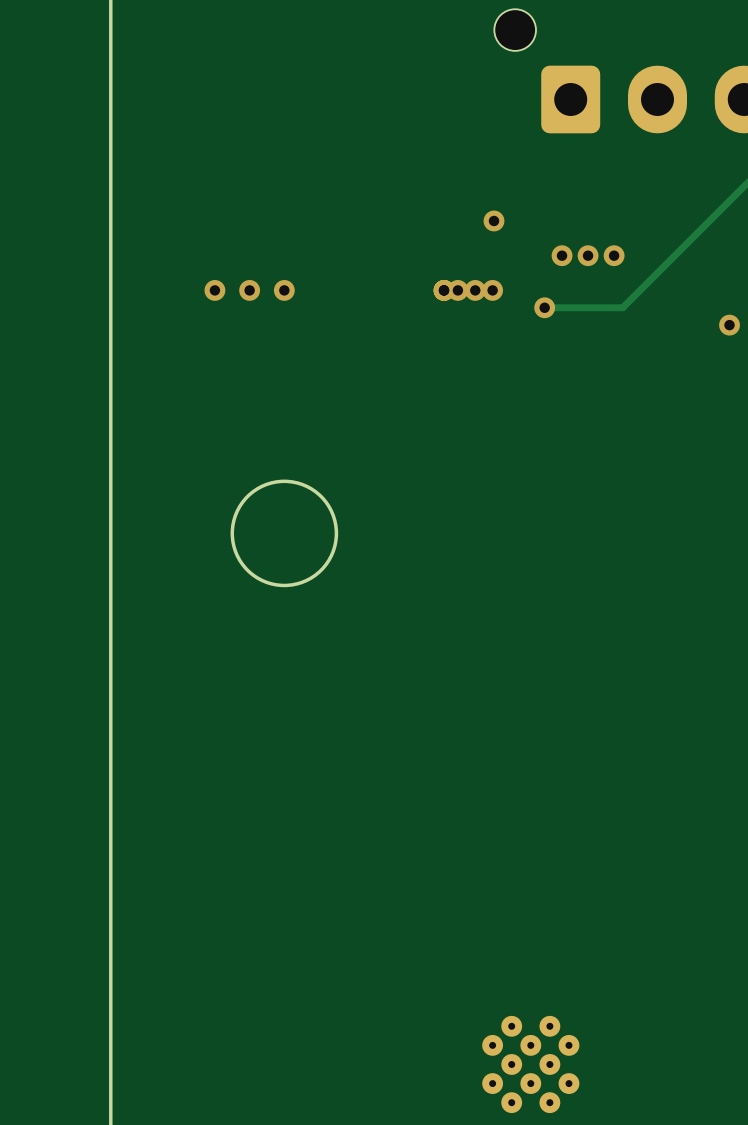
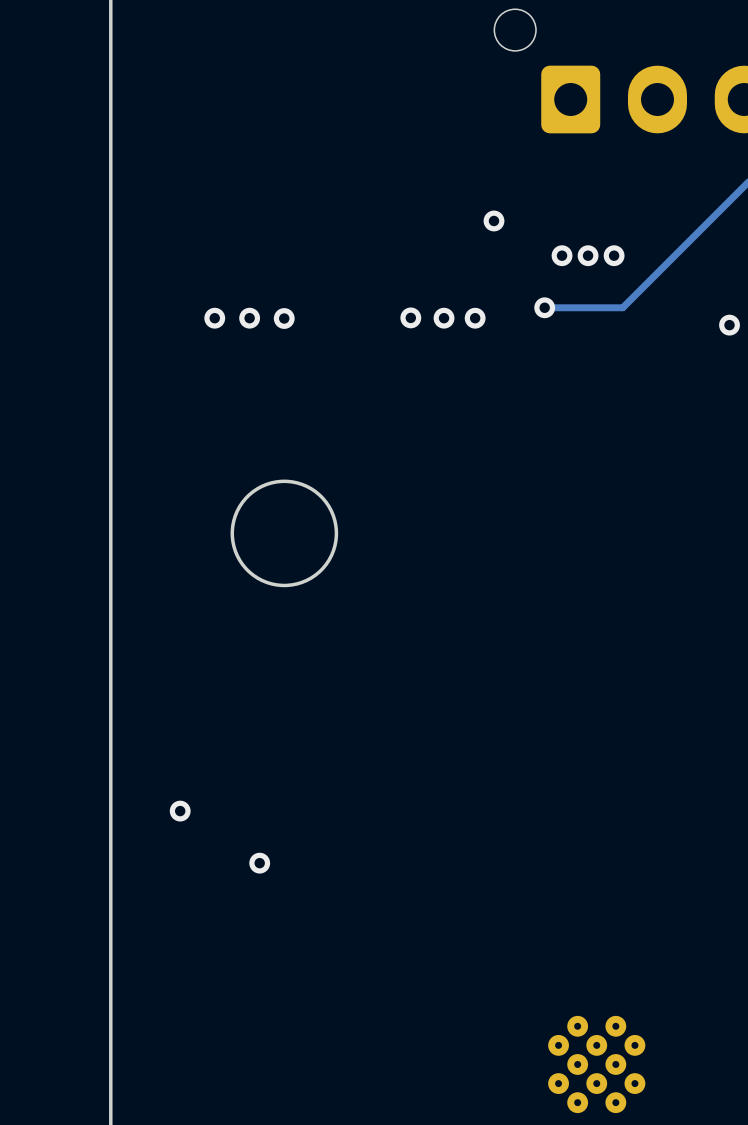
via: (214, 290) -> none
via: (249, 290) -> none
via: (284, 290) -> none
via: (444, 290) -> none
via: (457, 290) -> none
via: (475, 290) -> none
via: (492, 290) -> none
via: none -> (410, 317)
via: none -> (214, 318)
via: none -> (249, 318)
via: none -> (284, 318)
via: none -> (444, 318)
via: none -> (475, 318)
via: none -> (180, 811)
via: none -> (259, 863)
part position: (530, 1064) -> (596, 1064)

